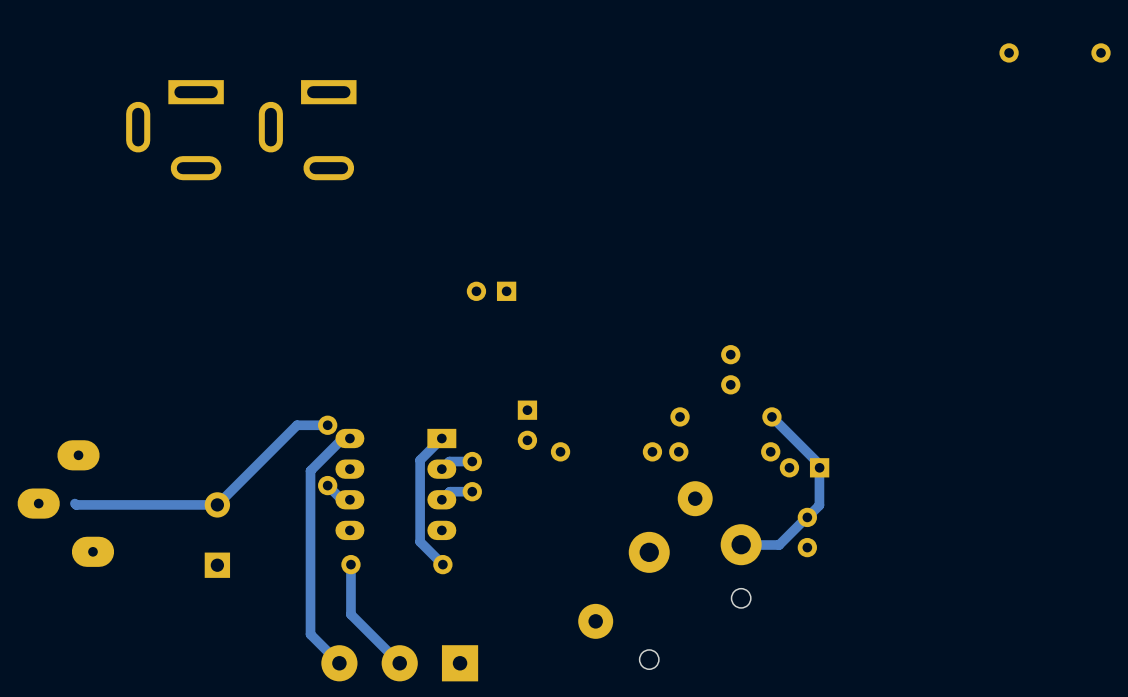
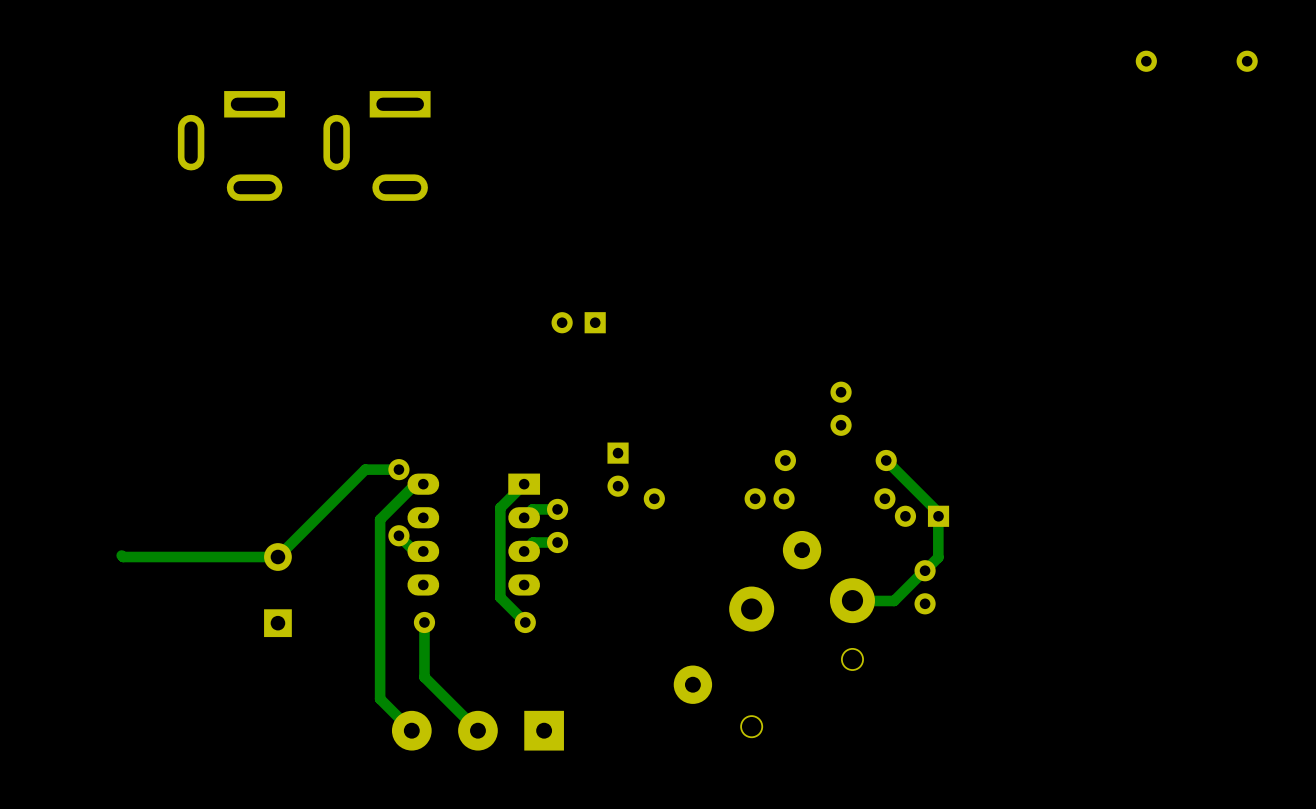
part: (65, 502) -> none

